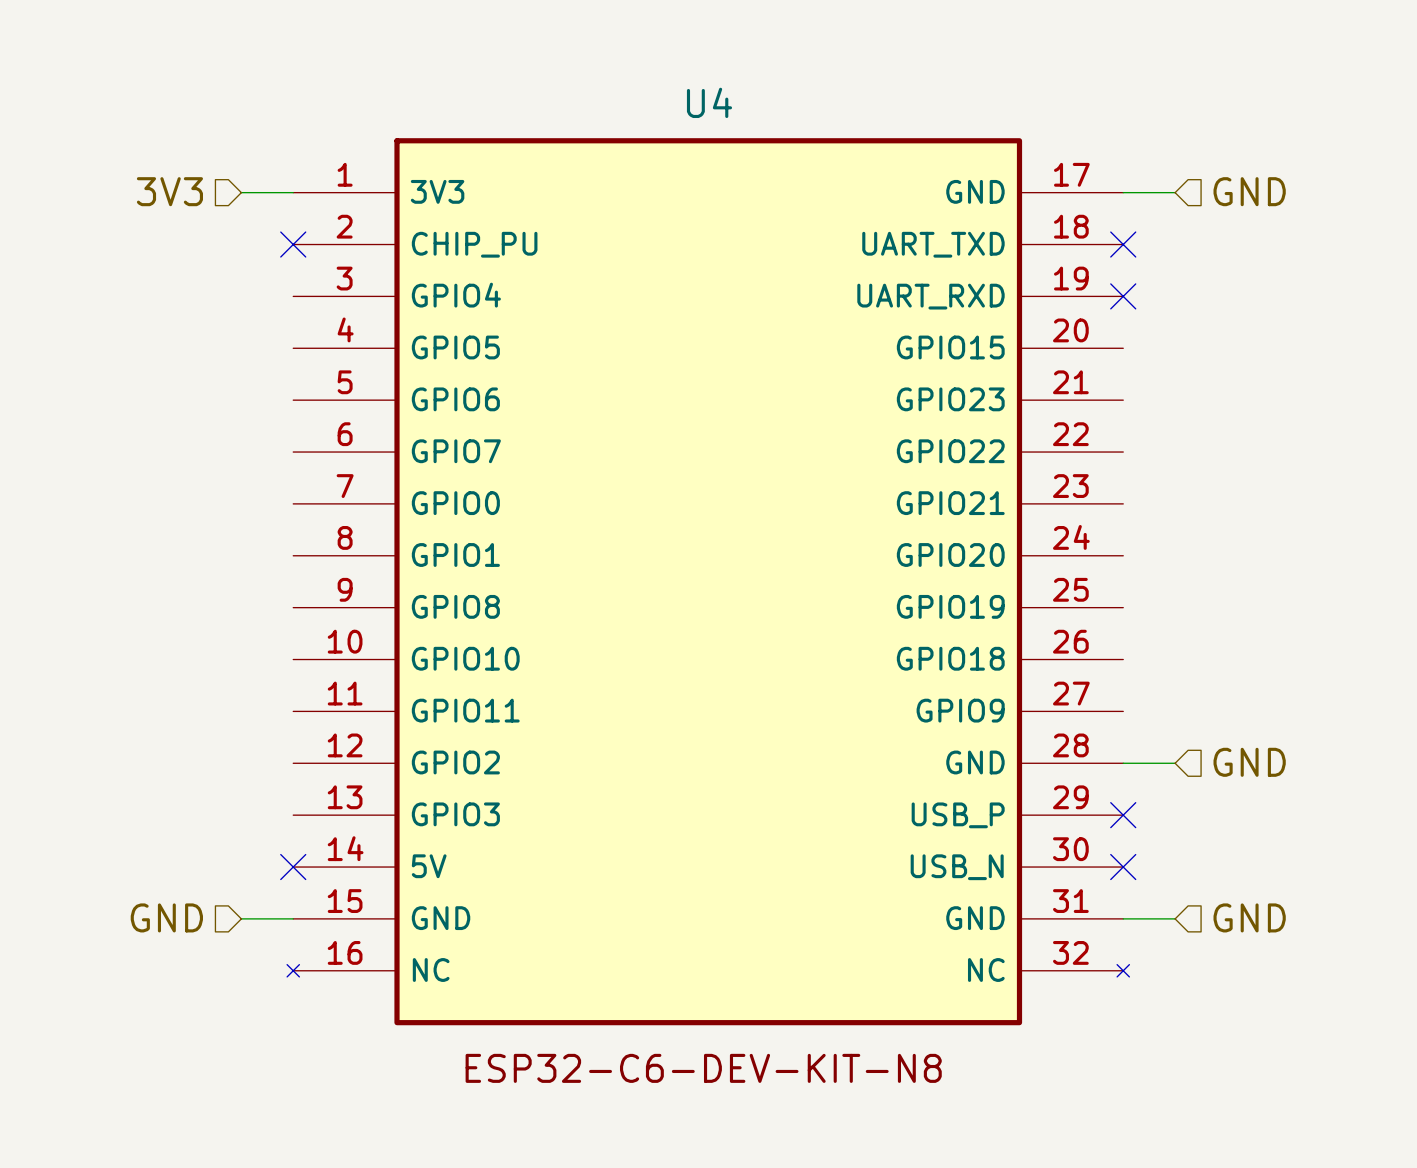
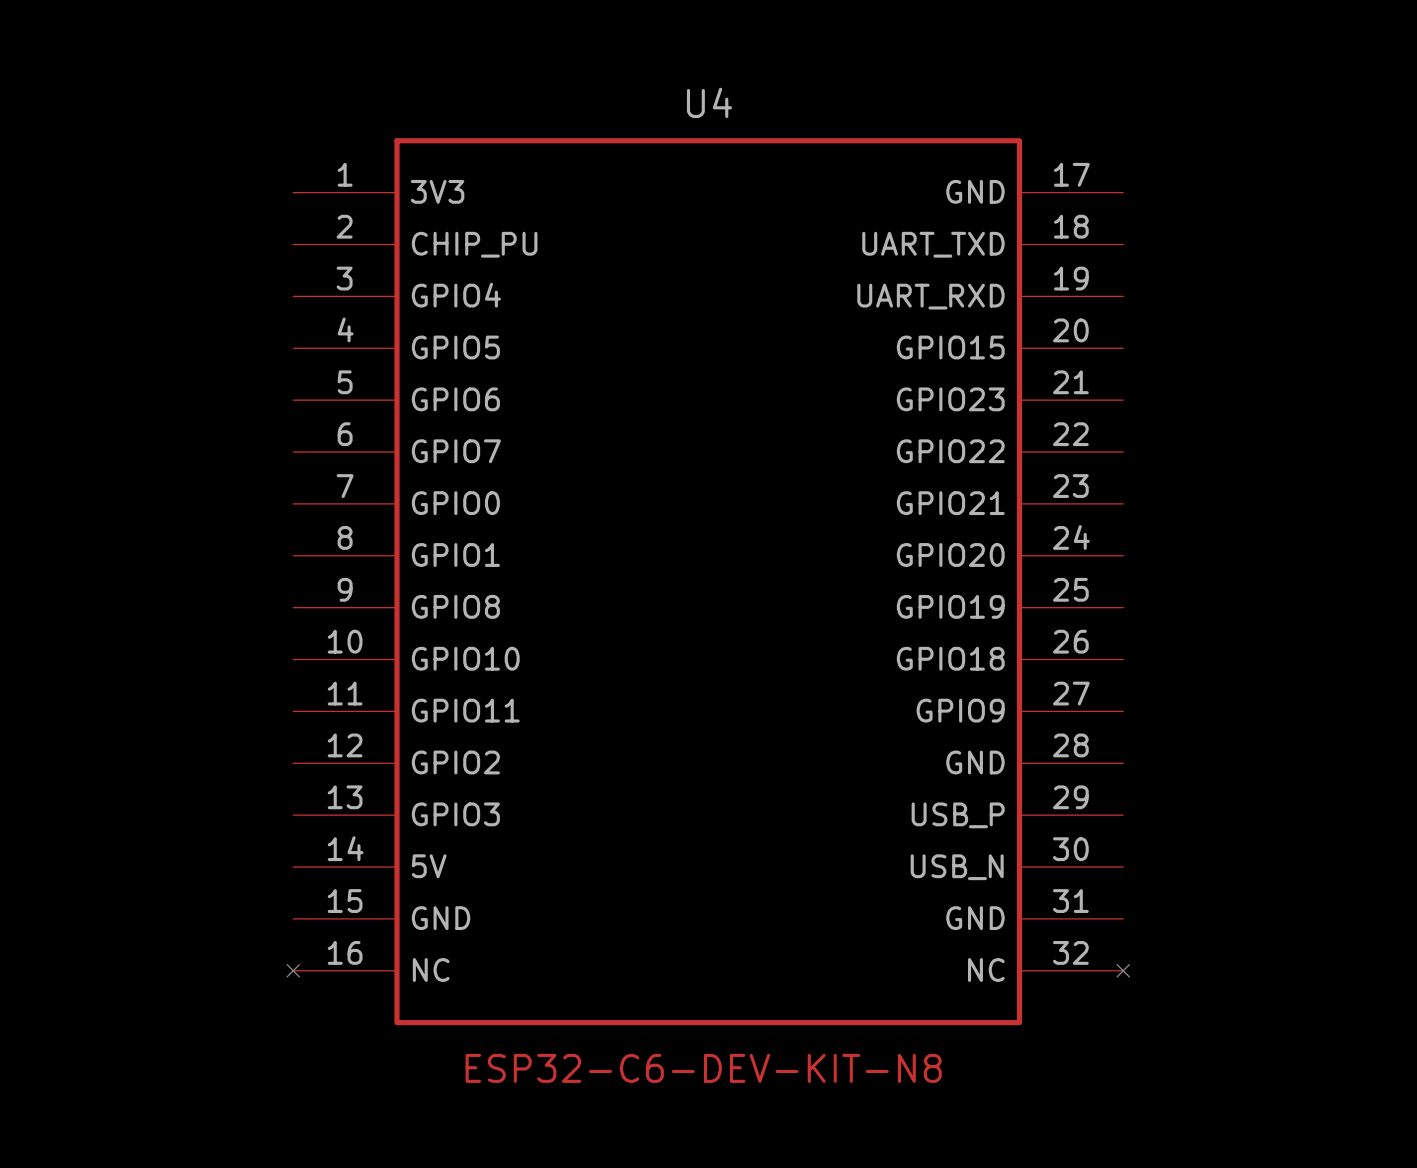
hierarchical label: 3V3 (169, 191) -> none
hierarchical label: GND (1249, 191) -> none
wire: (241, 192) (293, 192) -> none
wire: (1123, 192) (1175, 192) -> none
no-connect mark: (293, 244) -> none
no-connect mark: (1123, 244) -> none
no-connect mark: (1123, 296) -> none
hierarchical label: GND (1249, 762) -> none
wire: (1123, 763) (1175, 763) -> none
no-connect mark: (1123, 815) -> none
no-connect mark: (293, 867) -> none
no-connect mark: (1123, 867) -> none
hierarchical label: GND (166, 917) -> none
hierarchical label: GND (1249, 917) -> none
wire: (241, 918) (293, 918) -> none
wire: (1123, 918) (1175, 918) -> none

